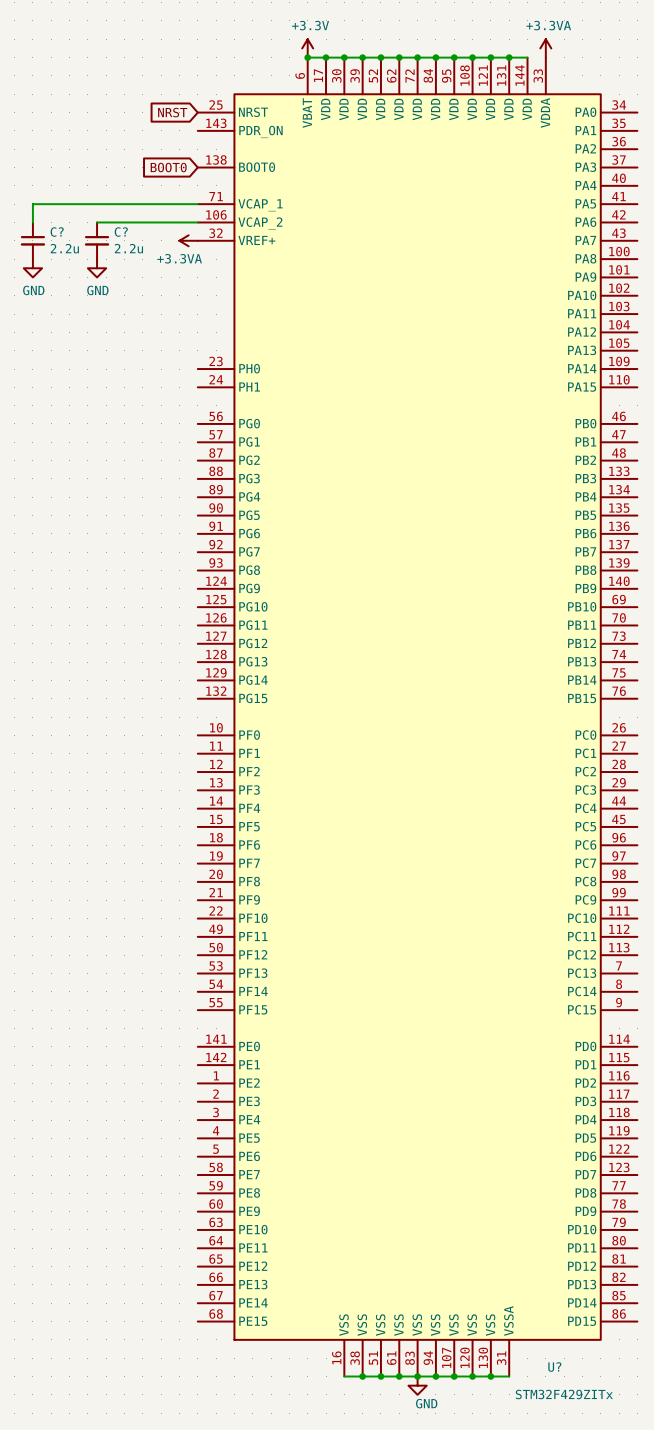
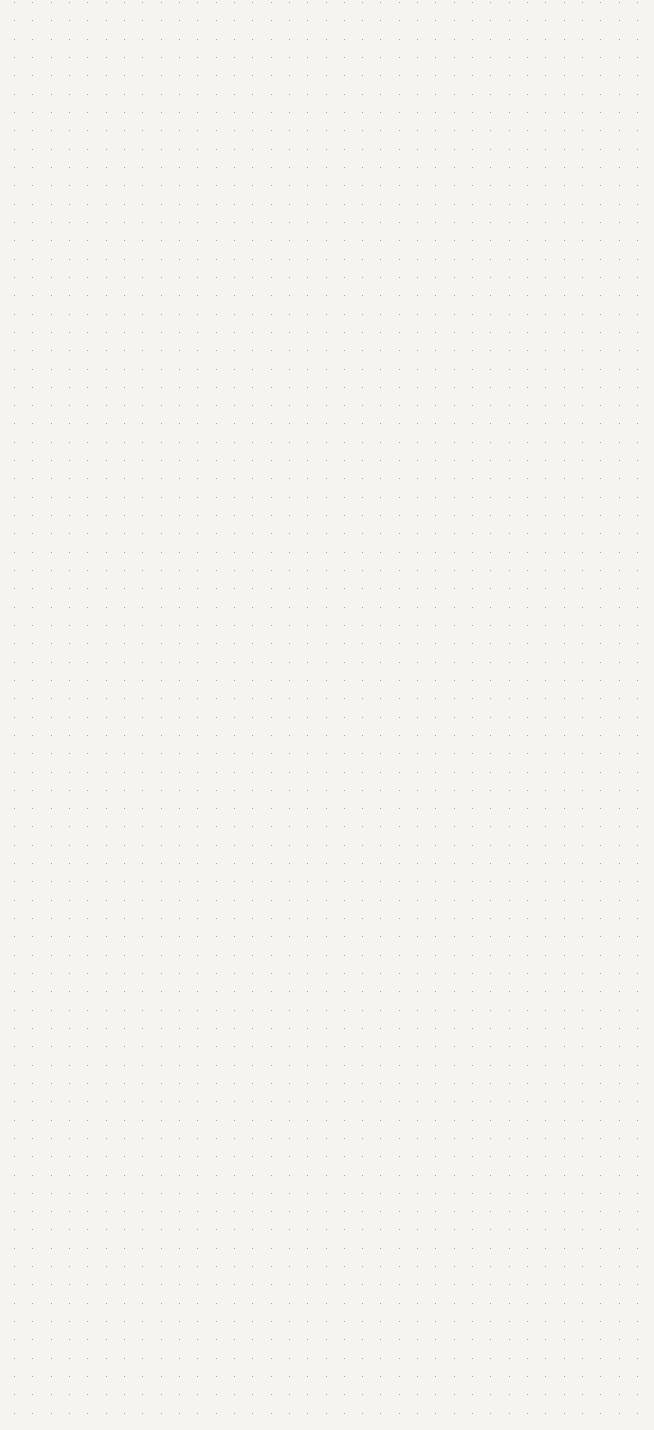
power symbol: +3.3V (307, 48) -> none
power symbol: +3.3VA (545, 48) -> none
wire: (307, 57) (527, 57) -> none
junction: (307, 57) -> none
junction: (326, 57) -> none
junction: (344, 57) -> none
junction: (362, 57) -> none
junction: (380, 57) -> none
junction: (399, 57) -> none
junction: (417, 57) -> none
junction: (435, 57) -> none
junction: (454, 57) -> none
junction: (472, 57) -> none
junction: (490, 57) -> none
junction: (509, 57) -> none
global label: NRST (172, 112) -> none
global label: BOOT0 (168, 167) -> none
wire: (197, 204) (32, 204) (32, 222) -> none
wire: (97, 222) (197, 222) -> none
C?: 2.2u (32, 240) -> none
C?: 2.2u (97, 240) -> none
power symbol: +3.3VA (188, 240) -> none
power symbol: GND (32, 268) -> none
power symbol: GND (97, 268) -> none
U?: STM32F429ZITx (417, 717) -> none
wire: (344, 1376) (509, 1376) -> none
junction: (362, 1376) -> none
junction: (380, 1376) -> none
junction: (399, 1376) -> none
junction: (417, 1376) -> none
junction: (435, 1376) -> none
junction: (454, 1376) -> none
junction: (472, 1376) -> none
junction: (490, 1376) -> none
power symbol: GND (417, 1385) -> none

